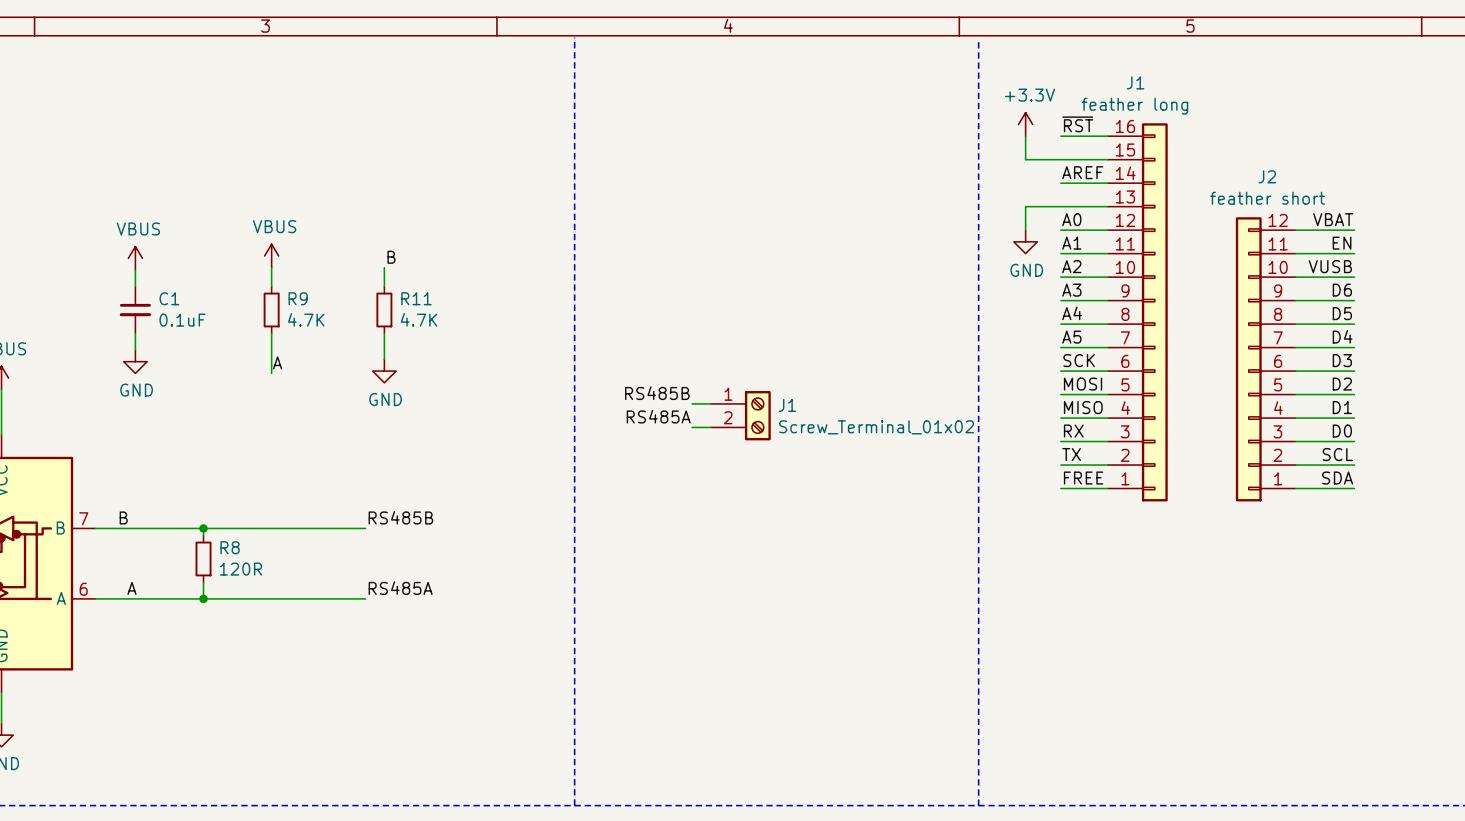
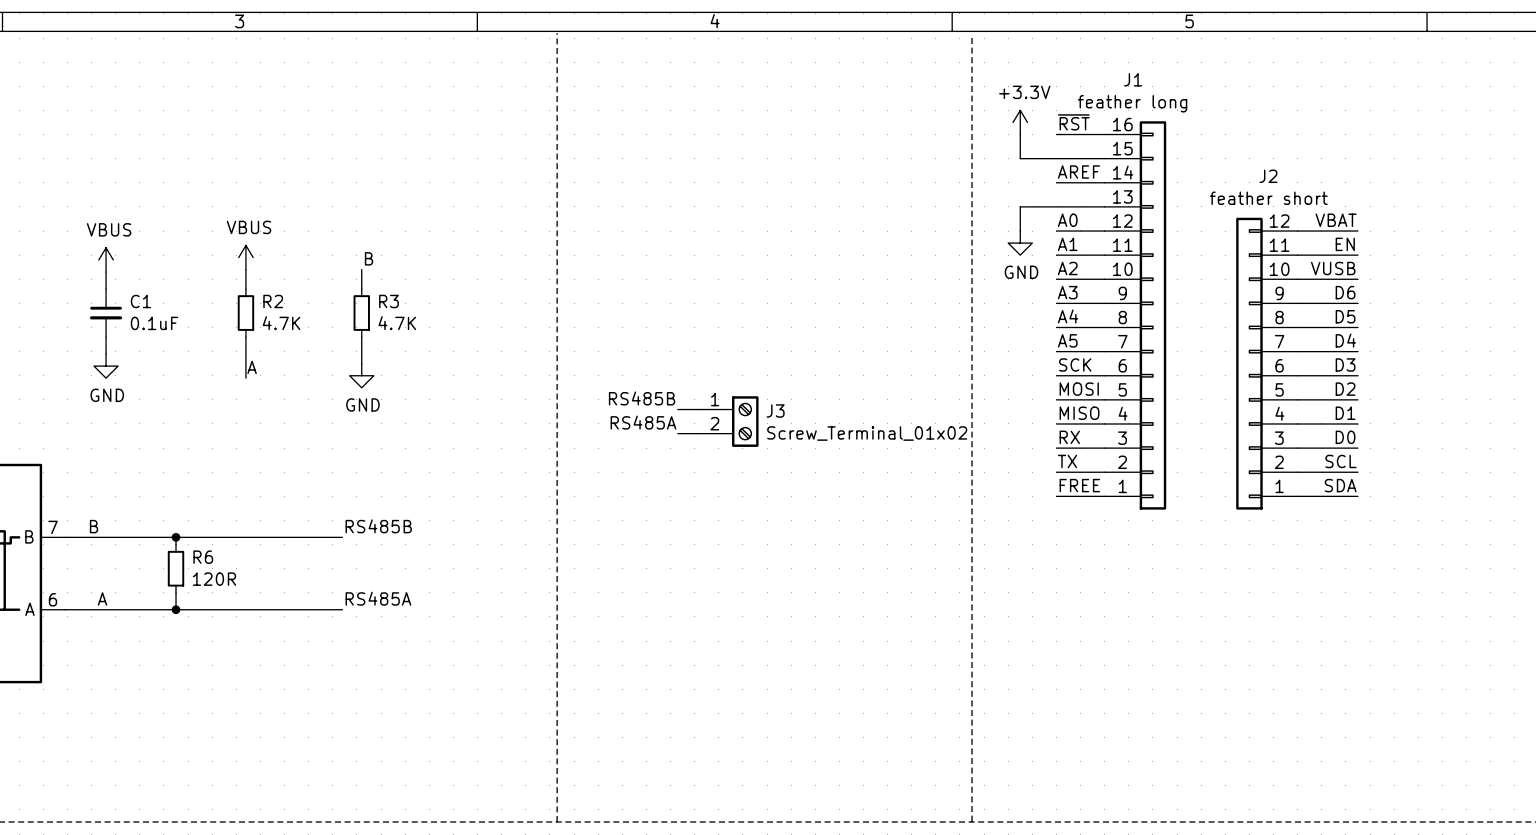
R9 name: R9 (298, 298) -> R2 (273, 301)
R11 name: R11 (416, 298) -> R3 (388, 301)
J1 name: J1 (787, 405) -> J3 (775, 410)
R8 name: R8 (230, 547) -> R6 (203, 557)

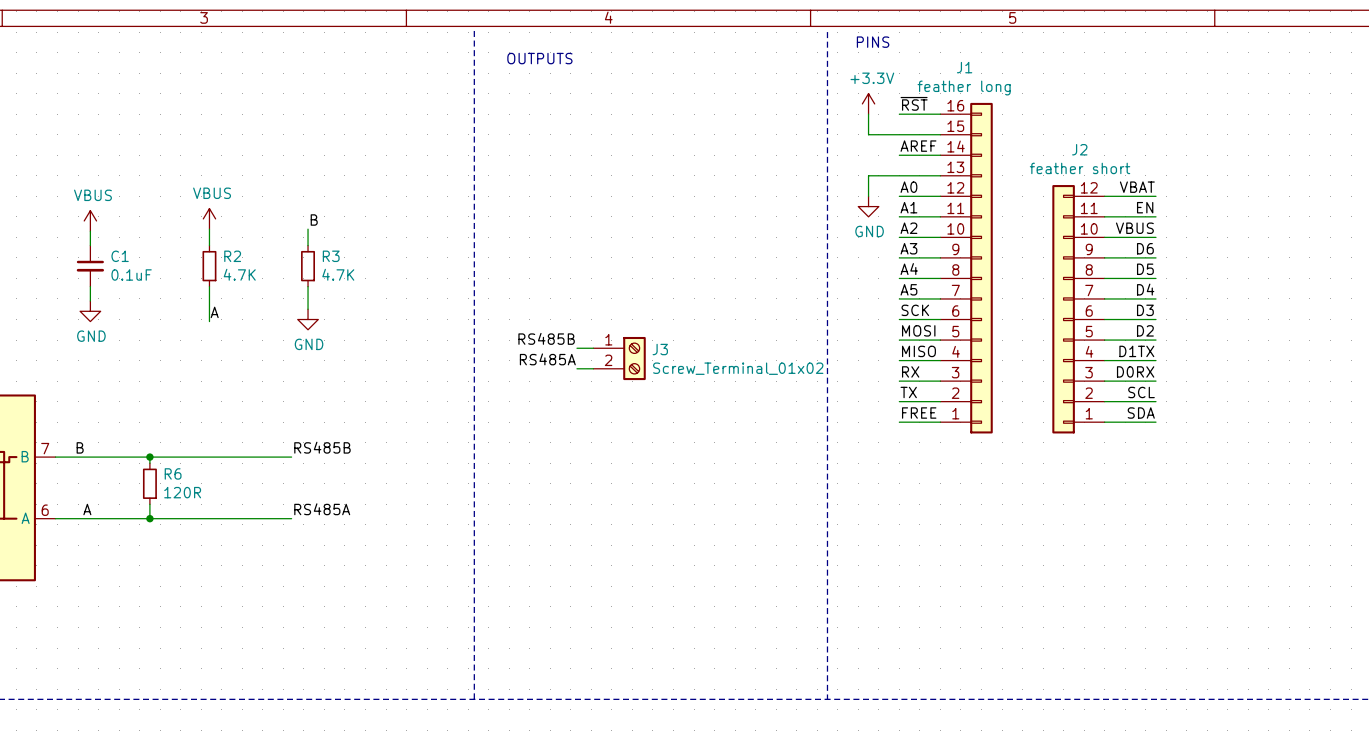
text: none -> PINS (873, 42)
text: none -> OUTPUTS (539, 58)
label: VUSB (1333, 268) -> VBUS (1134, 228)
label: D1 (1345, 413) -> D1TX (1136, 351)
label: D0 (1345, 437) -> D0RX (1135, 371)

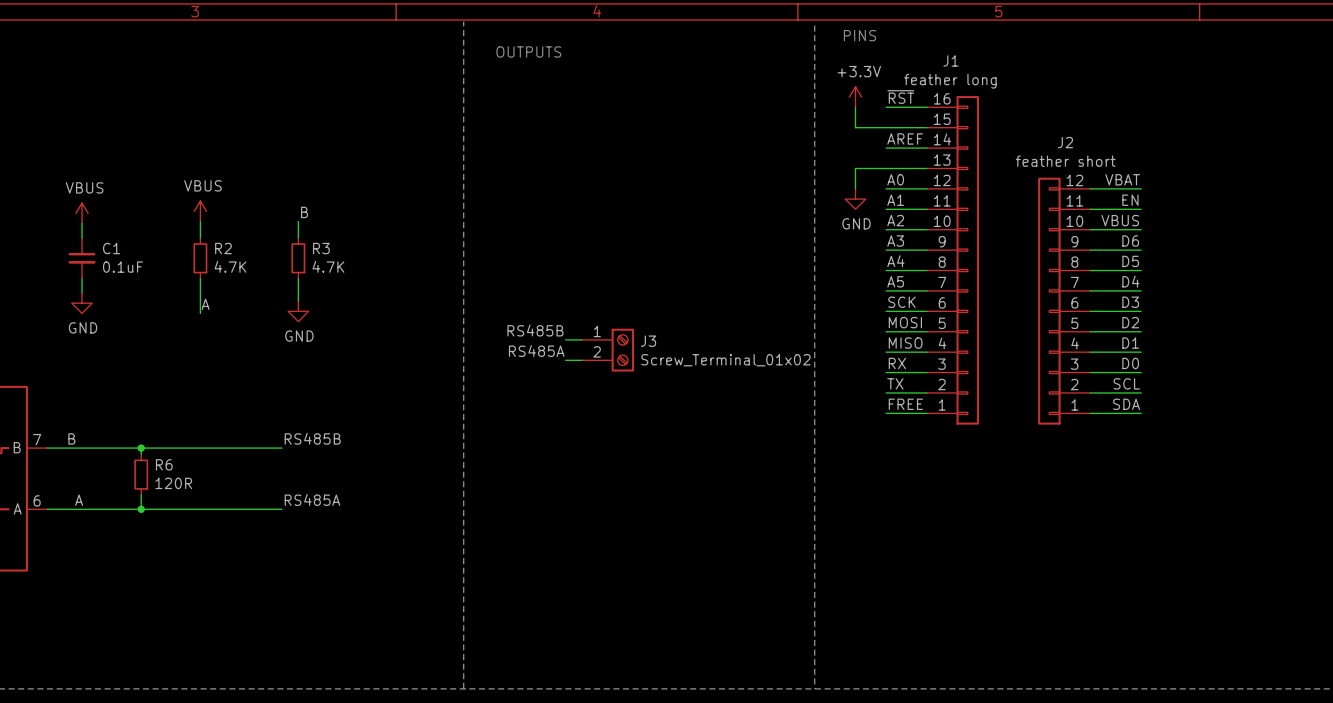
label: D1TX (1136, 351) -> D1 (1130, 343)
label: D0RX (1135, 371) -> D0 (1130, 363)

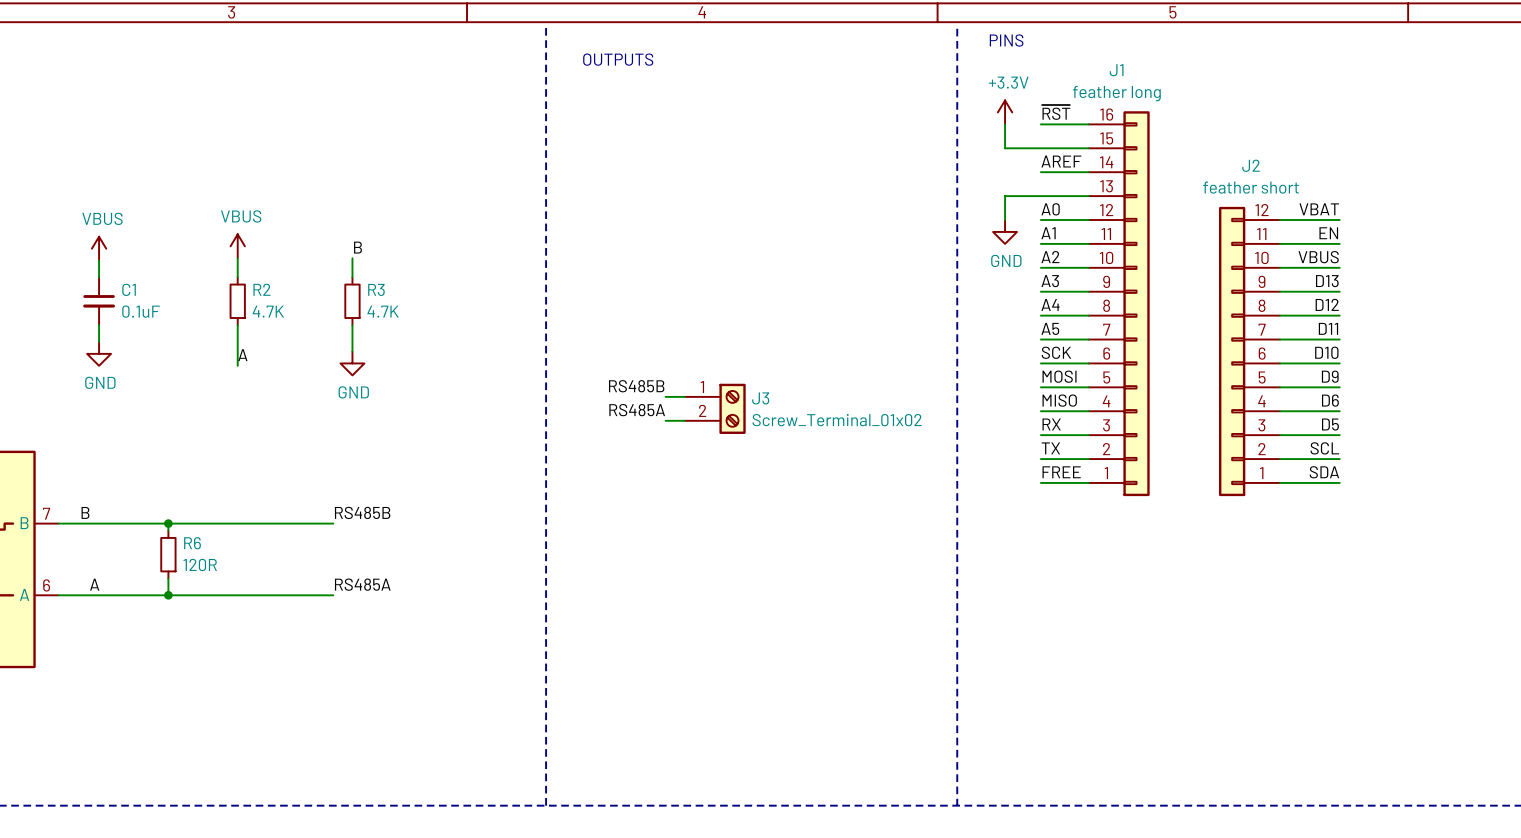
label: D6 (1130, 241) -> D13 (1327, 281)
label: D5 (1130, 261) -> D12 (1327, 304)
label: D4 (1130, 281) -> D11 (1328, 328)
label: D3 (1130, 302) -> D10 (1326, 352)
label: D2 (1130, 322) -> D9 (1330, 376)
label: D1 (1130, 343) -> D6 (1330, 400)
label: D0 (1130, 363) -> D5 (1330, 424)

